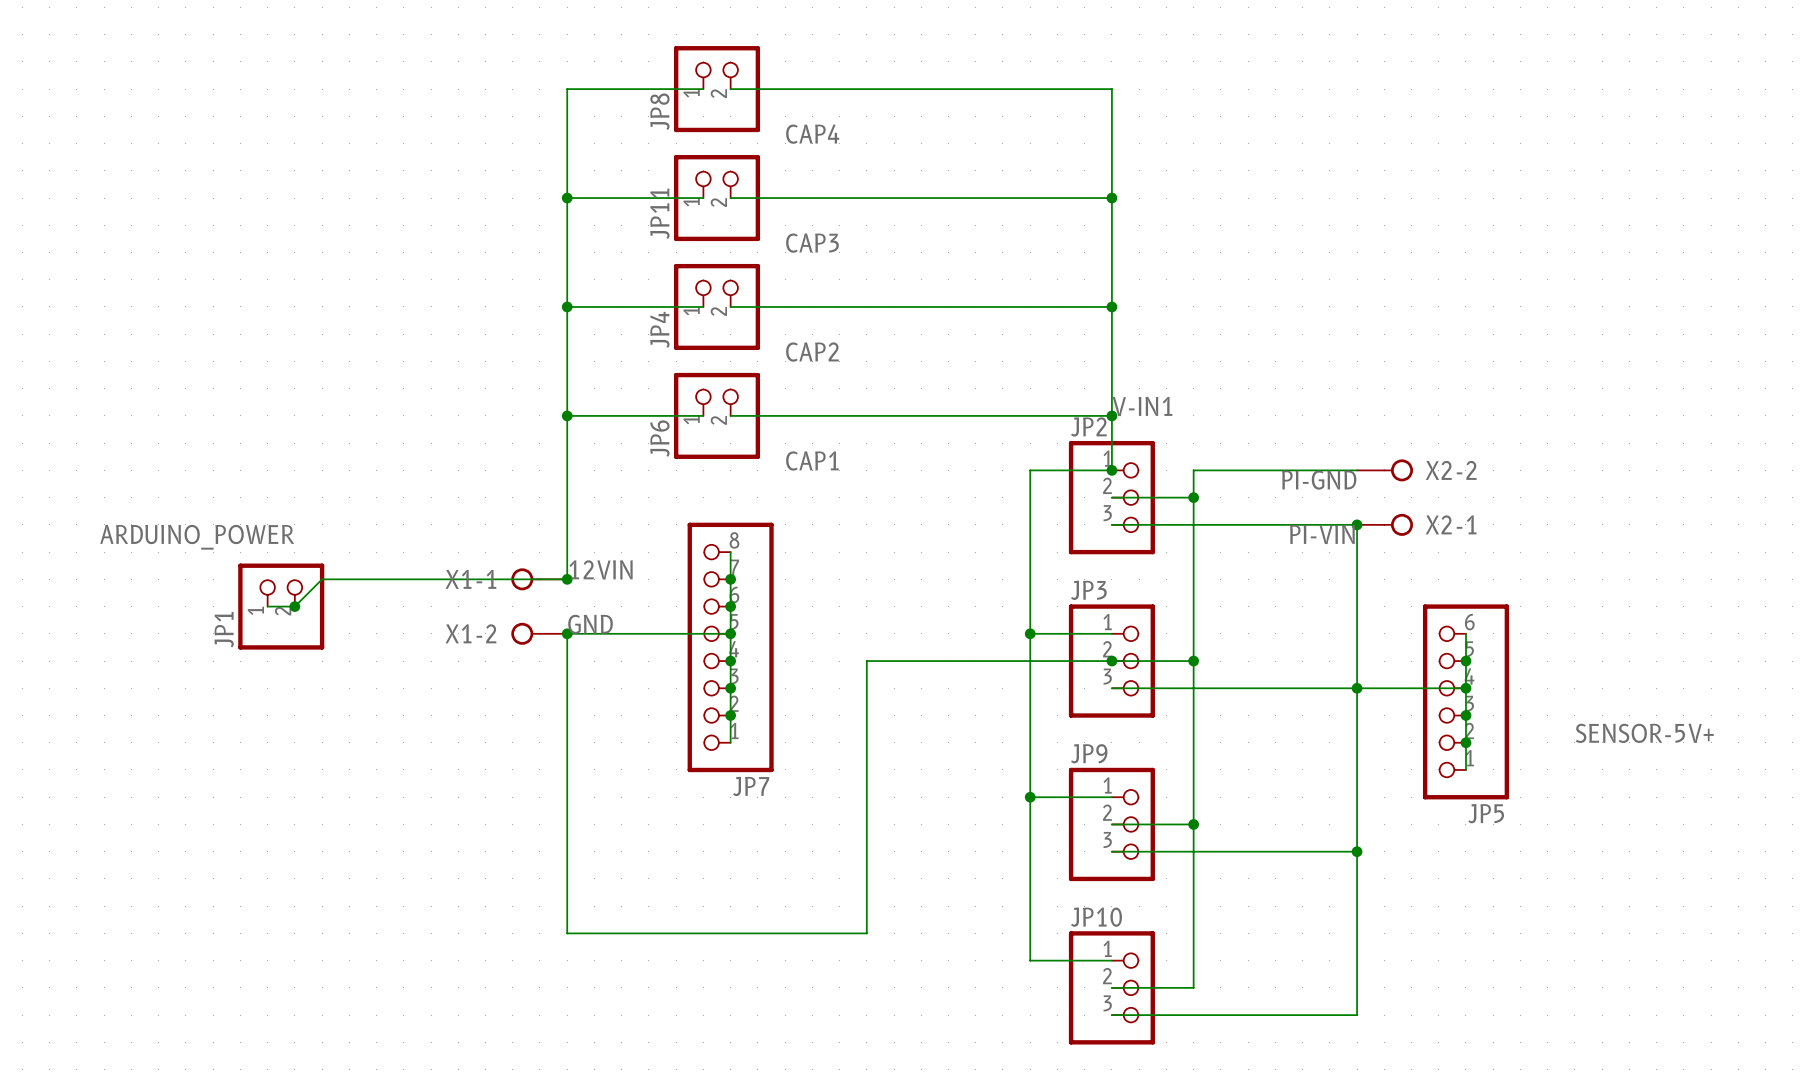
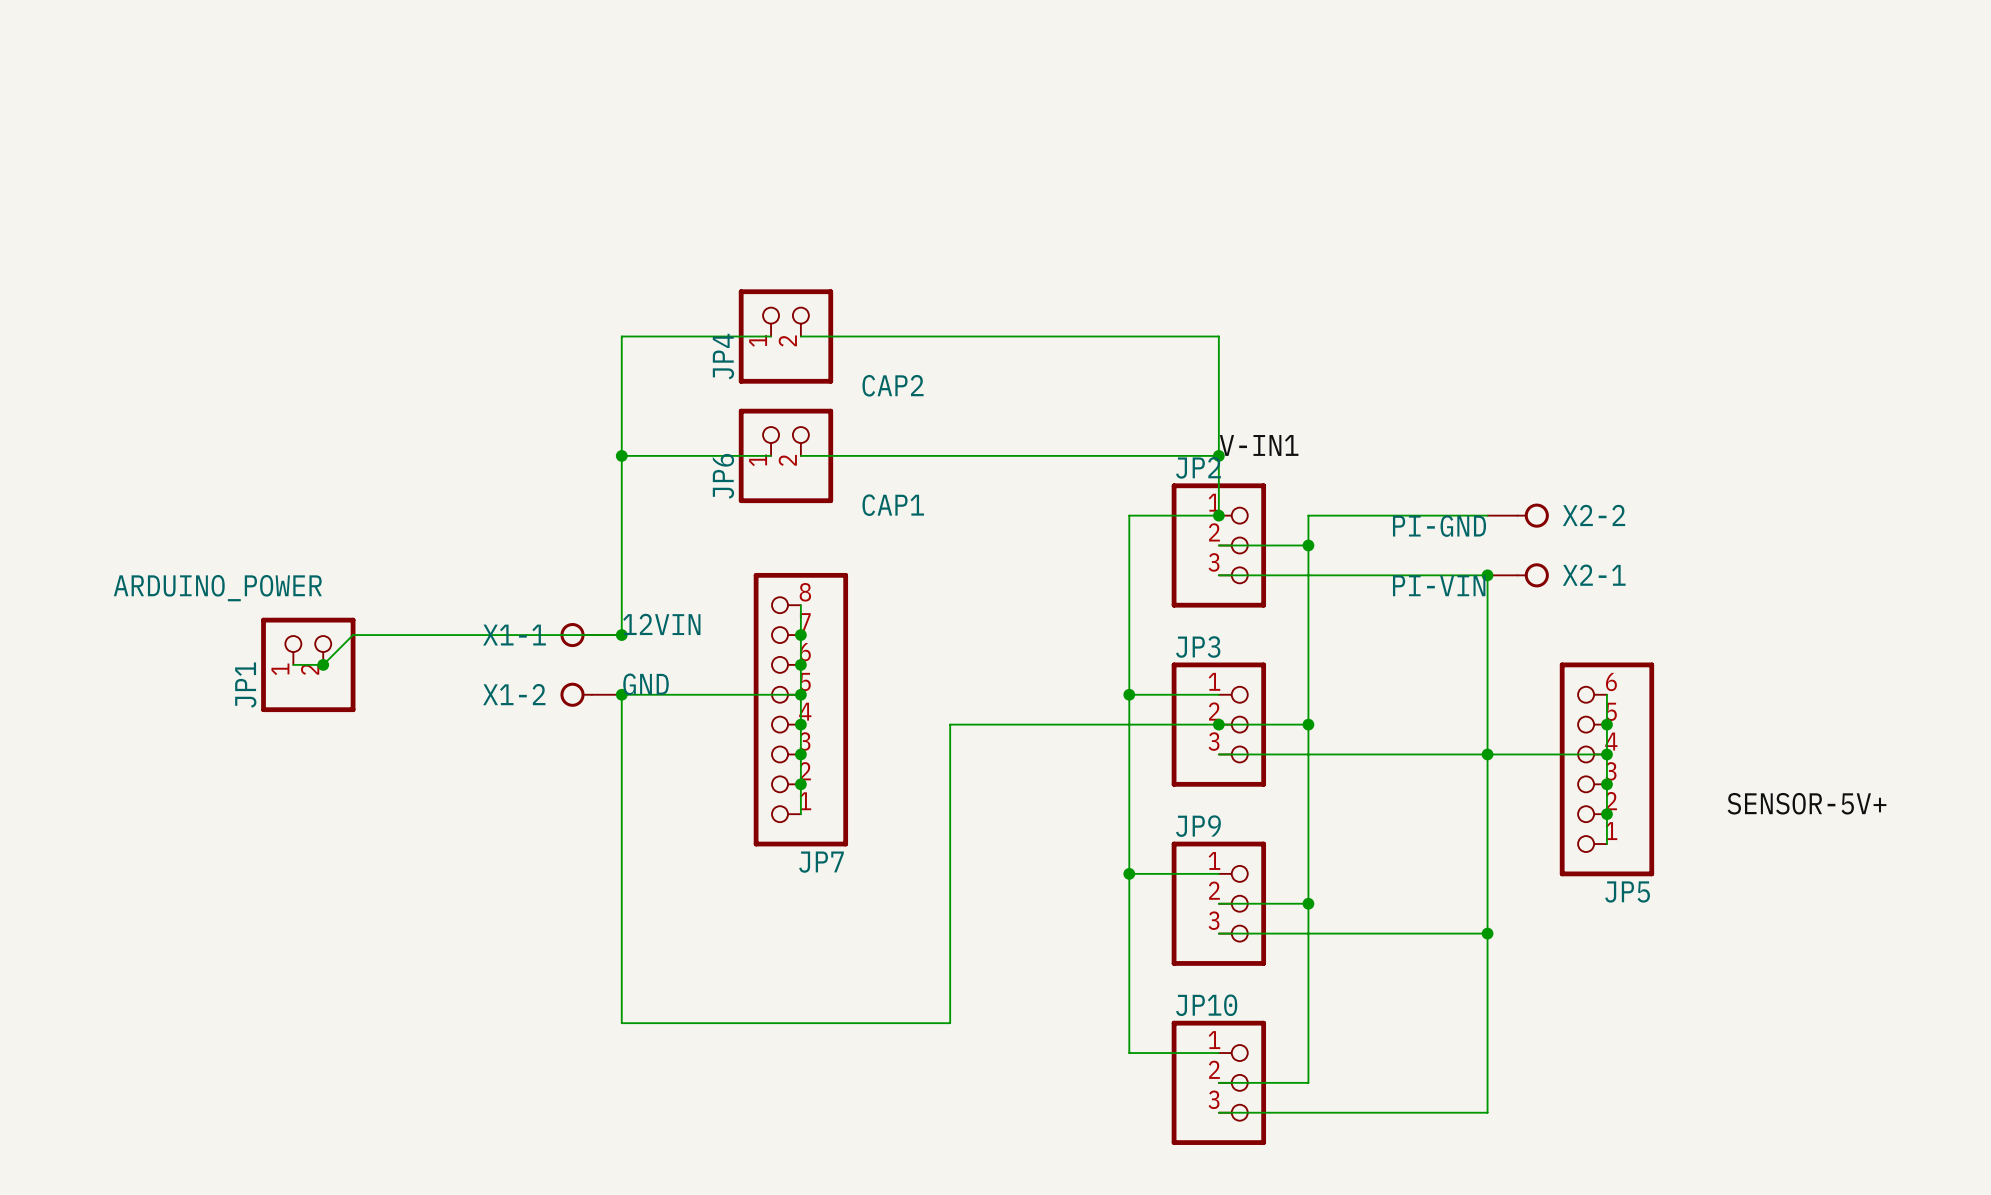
wire: (703, 89) (567, 89) (567, 306) -> none
JP8: (717, 89) -> none
wire: (730, 89) (1111, 89) (1111, 306) -> none
wire: (567, 198) (703, 198) -> none
junction: (567, 198) -> none
JP11: (717, 198) -> none
wire: (730, 198) (1111, 198) -> none
junction: (1111, 198) -> none
junction: (567, 306) -> none
junction: (1111, 306) -> none

